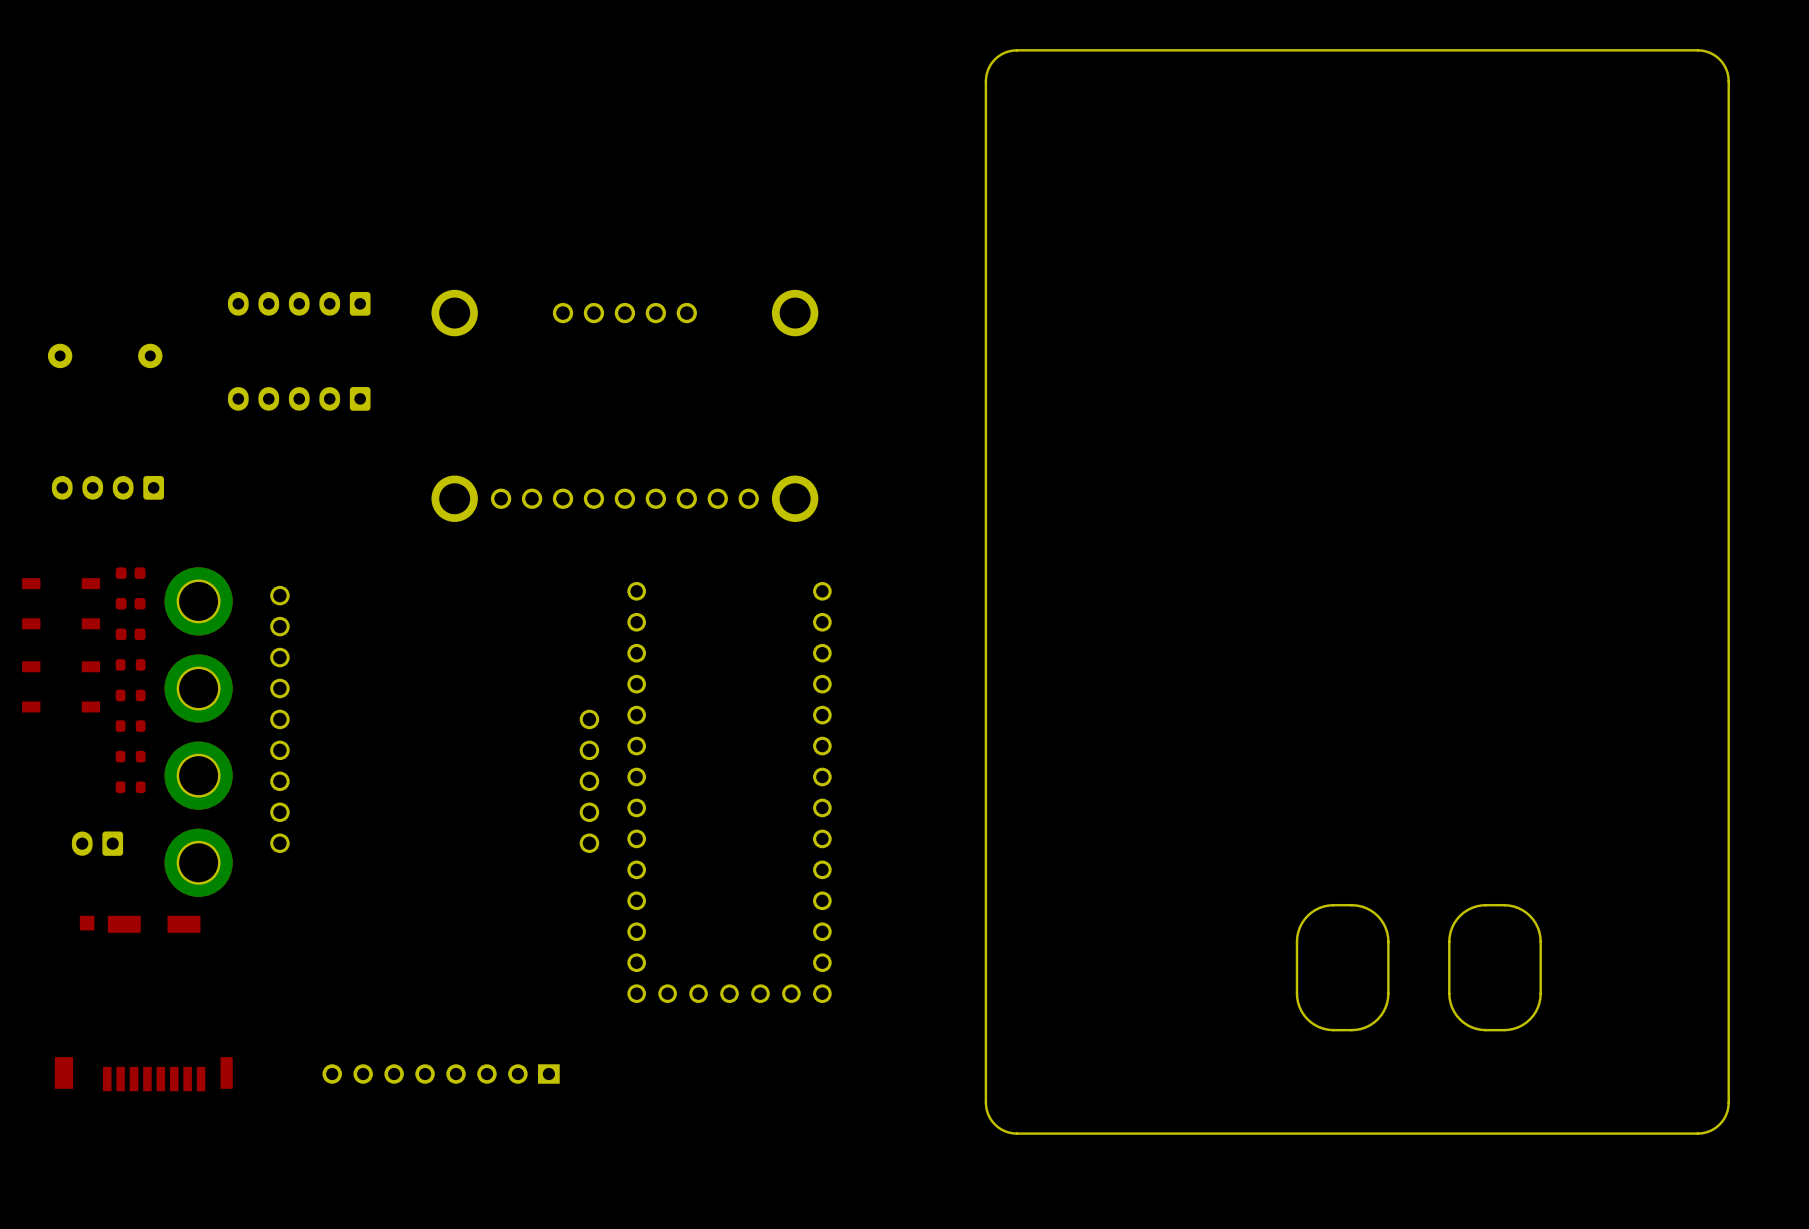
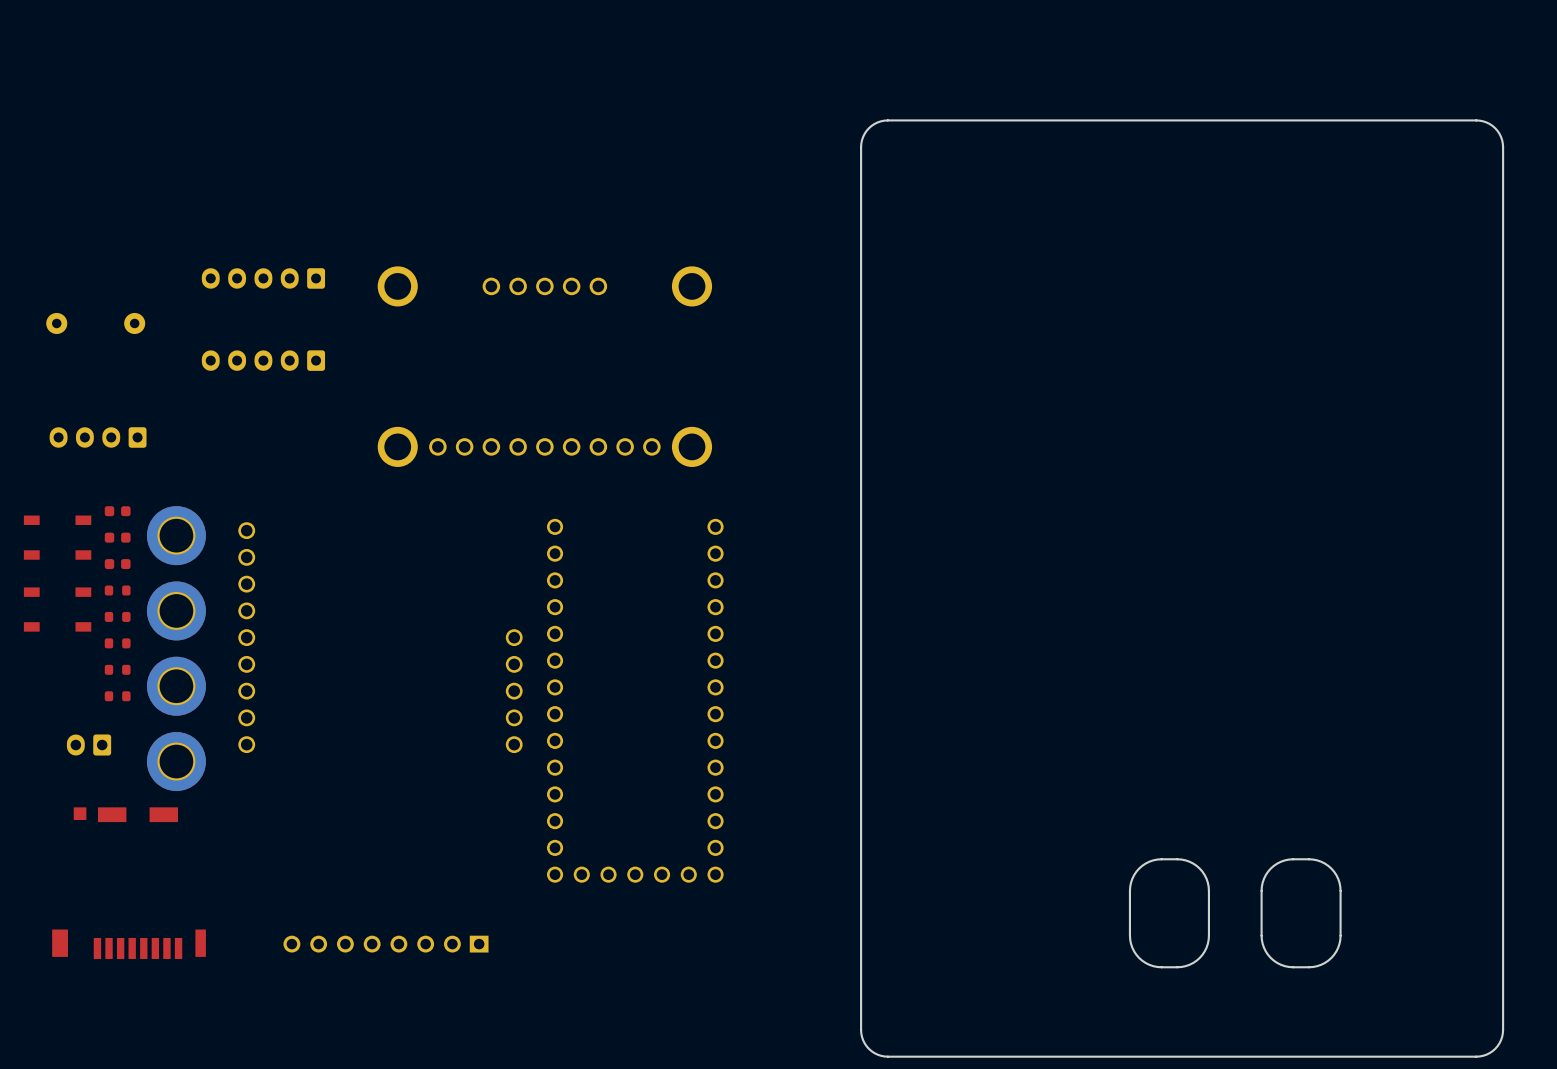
board edge: (1697, 50) (1016, 50) (1001, 54) (990, 65) (985, 81) (985, 1102) (990, 1118) (1001, 1129) (1016, 1133) (1697, 1133) (1713, 1129) (1724, 1118) (1728, 1102) (1728, 81) (1726, 69) (1719, 59) (1709, 52) (1697, 50) -> (1476, 120) (887, 120) (874, 124) (864, 133) (861, 147) (861, 1029) (864, 1043) (874, 1053) (887, 1056) (1476, 1056) (1489, 1053) (1499, 1043) (1503, 1029) (1503, 147) (1501, 136) (1495, 128) (1486, 122) (1476, 120)
board edge: (1351, 905) (1328, 905) (1315, 910) (1304, 919) (1298, 932) (1298, 1003) (1307, 1019) (1324, 1028) (1351, 1030) (1365, 1027) (1377, 1019) (1387, 1003) (1388, 941) (1385, 927) (1374, 912) (1365, 907) (1351, 905) -> (1177, 859) (1157, 859) (1145, 863) (1136, 871) (1131, 882) (1131, 943) (1139, 958) (1153, 966) (1177, 967) (1189, 964) (1202, 954) (1207, 943) (1208, 890) (1206, 878) (1196, 865) (1185, 860) (1177, 859)
board edge: (1504, 905) (1481, 905) (1467, 910) (1456, 919) (1450, 932) (1450, 1003) (1460, 1019) (1476, 1028) (1504, 1030) (1518, 1027) (1533, 1015) (1539, 1003) (1540, 941) (1537, 927) (1526, 912) (1518, 907) (1504, 905) -> (1308, 859) (1289, 859) (1277, 863) (1268, 871) (1262, 882) (1262, 943) (1270, 958) (1285, 966) (1308, 967) (1321, 964) (1334, 954) (1339, 943) (1340, 890) (1338, 878) (1328, 865) (1317, 860) (1308, 859)

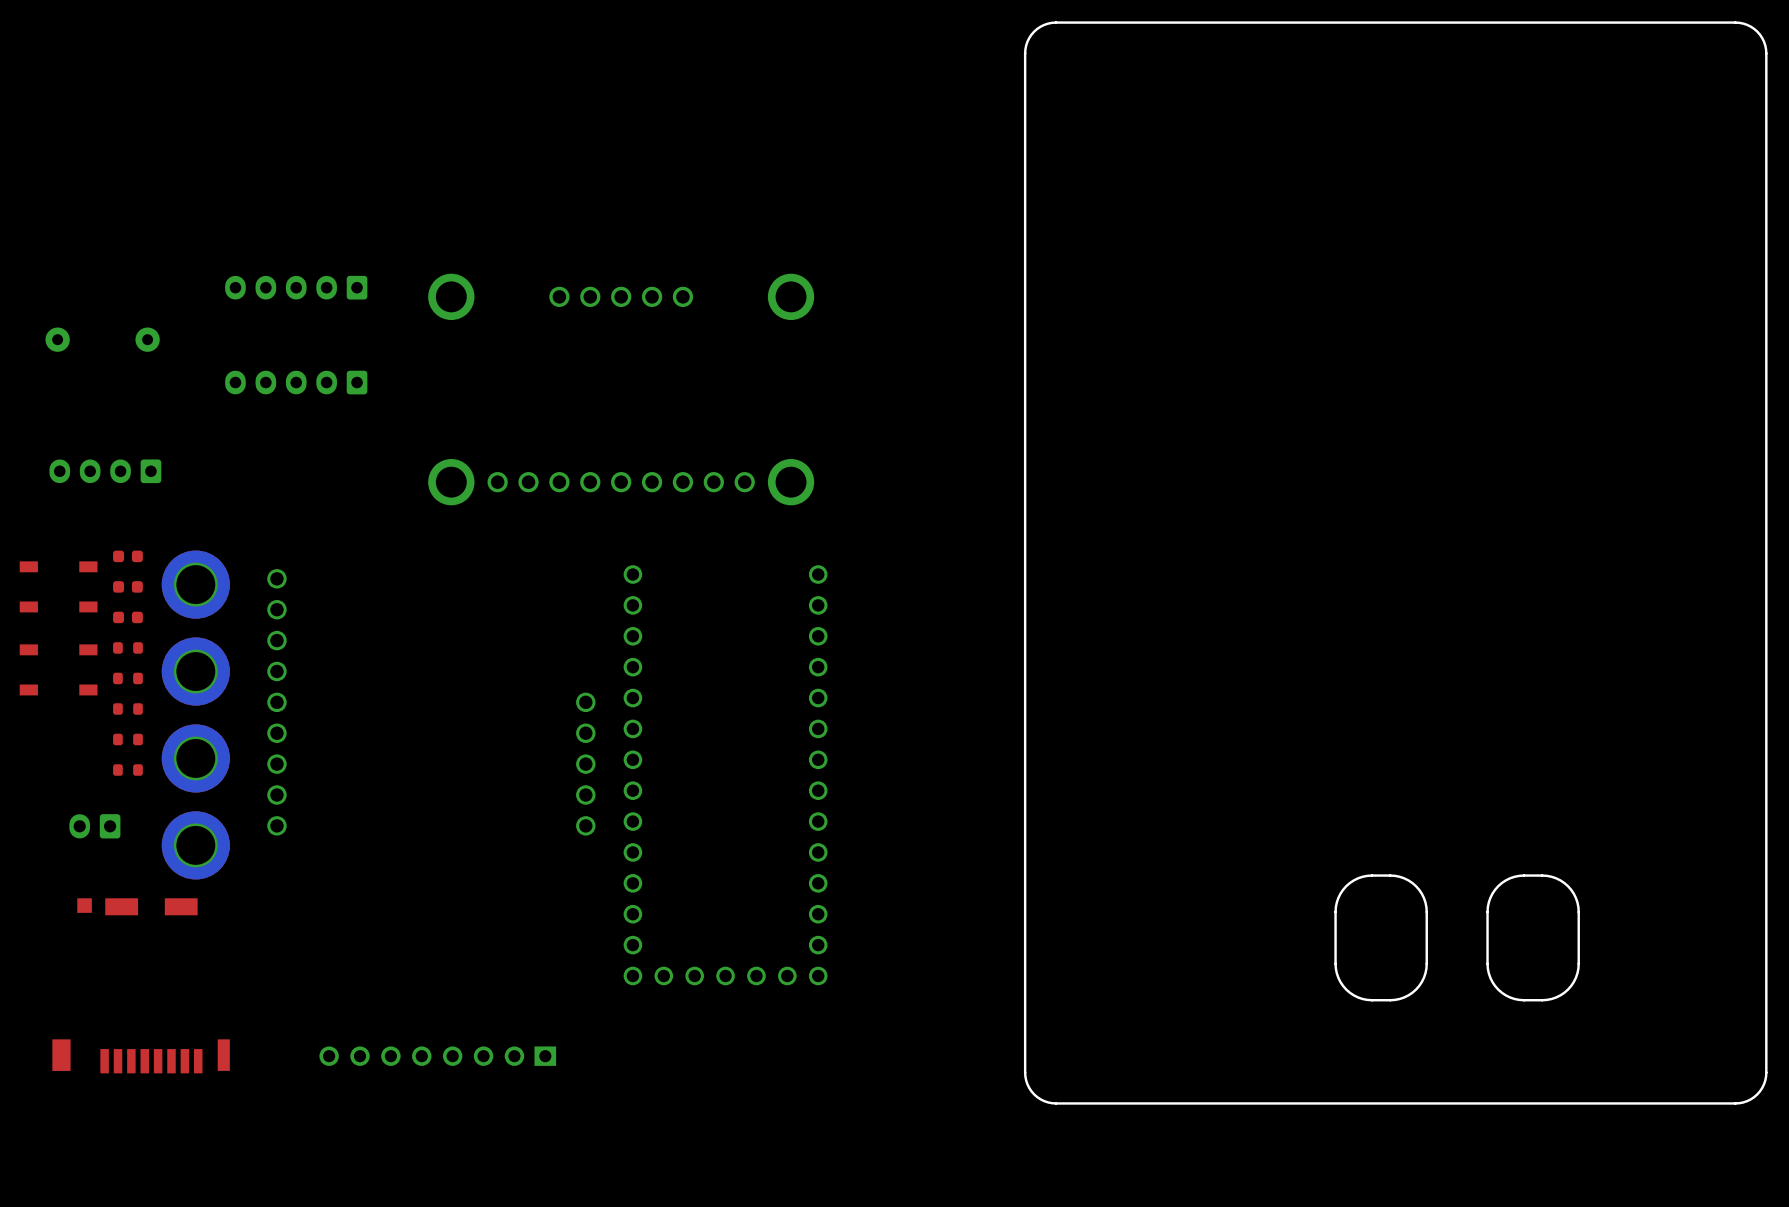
board edge: (1476, 120) (887, 120) (874, 124) (864, 133) (861, 147) (861, 1029) (864, 1043) (874, 1053) (887, 1056) (1476, 1056) (1489, 1053) (1499, 1043) (1503, 1029) (1503, 147) (1501, 136) (1495, 128) (1486, 122) (1476, 120) -> (1735, 22) (1056, 22) (1040, 26) (1029, 38) (1025, 53) (1025, 1072) (1029, 1088) (1040, 1099) (1056, 1103) (1735, 1103) (1750, 1099) (1762, 1088) (1766, 1072) (1766, 53) (1763, 41) (1757, 31) (1747, 24) (1735, 22)
board edge: (1177, 859) (1157, 859) (1145, 863) (1136, 871) (1131, 882) (1131, 943) (1139, 958) (1153, 966) (1177, 967) (1189, 964) (1202, 954) (1207, 943) (1208, 890) (1206, 878) (1196, 865) (1185, 860) (1177, 859) -> (1390, 875) (1367, 875) (1353, 880) (1343, 889) (1336, 902) (1336, 973) (1346, 989) (1362, 998) (1390, 1000) (1404, 997) (1419, 985) (1425, 973) (1426, 912) (1423, 898) (1412, 883) (1399, 876) (1390, 875)
board edge: (1308, 859) (1289, 859) (1277, 863) (1268, 871) (1262, 882) (1262, 943) (1270, 958) (1285, 966) (1308, 967) (1321, 964) (1334, 954) (1339, 943) (1340, 890) (1338, 878) (1328, 865) (1317, 860) (1308, 859) -> (1542, 875) (1519, 875) (1505, 880) (1495, 889) (1488, 902) (1488, 973) (1498, 989) (1514, 998) (1542, 1000) (1556, 997) (1571, 985) (1577, 973) (1578, 912) (1575, 898) (1564, 883) (1551, 876) (1542, 875)

